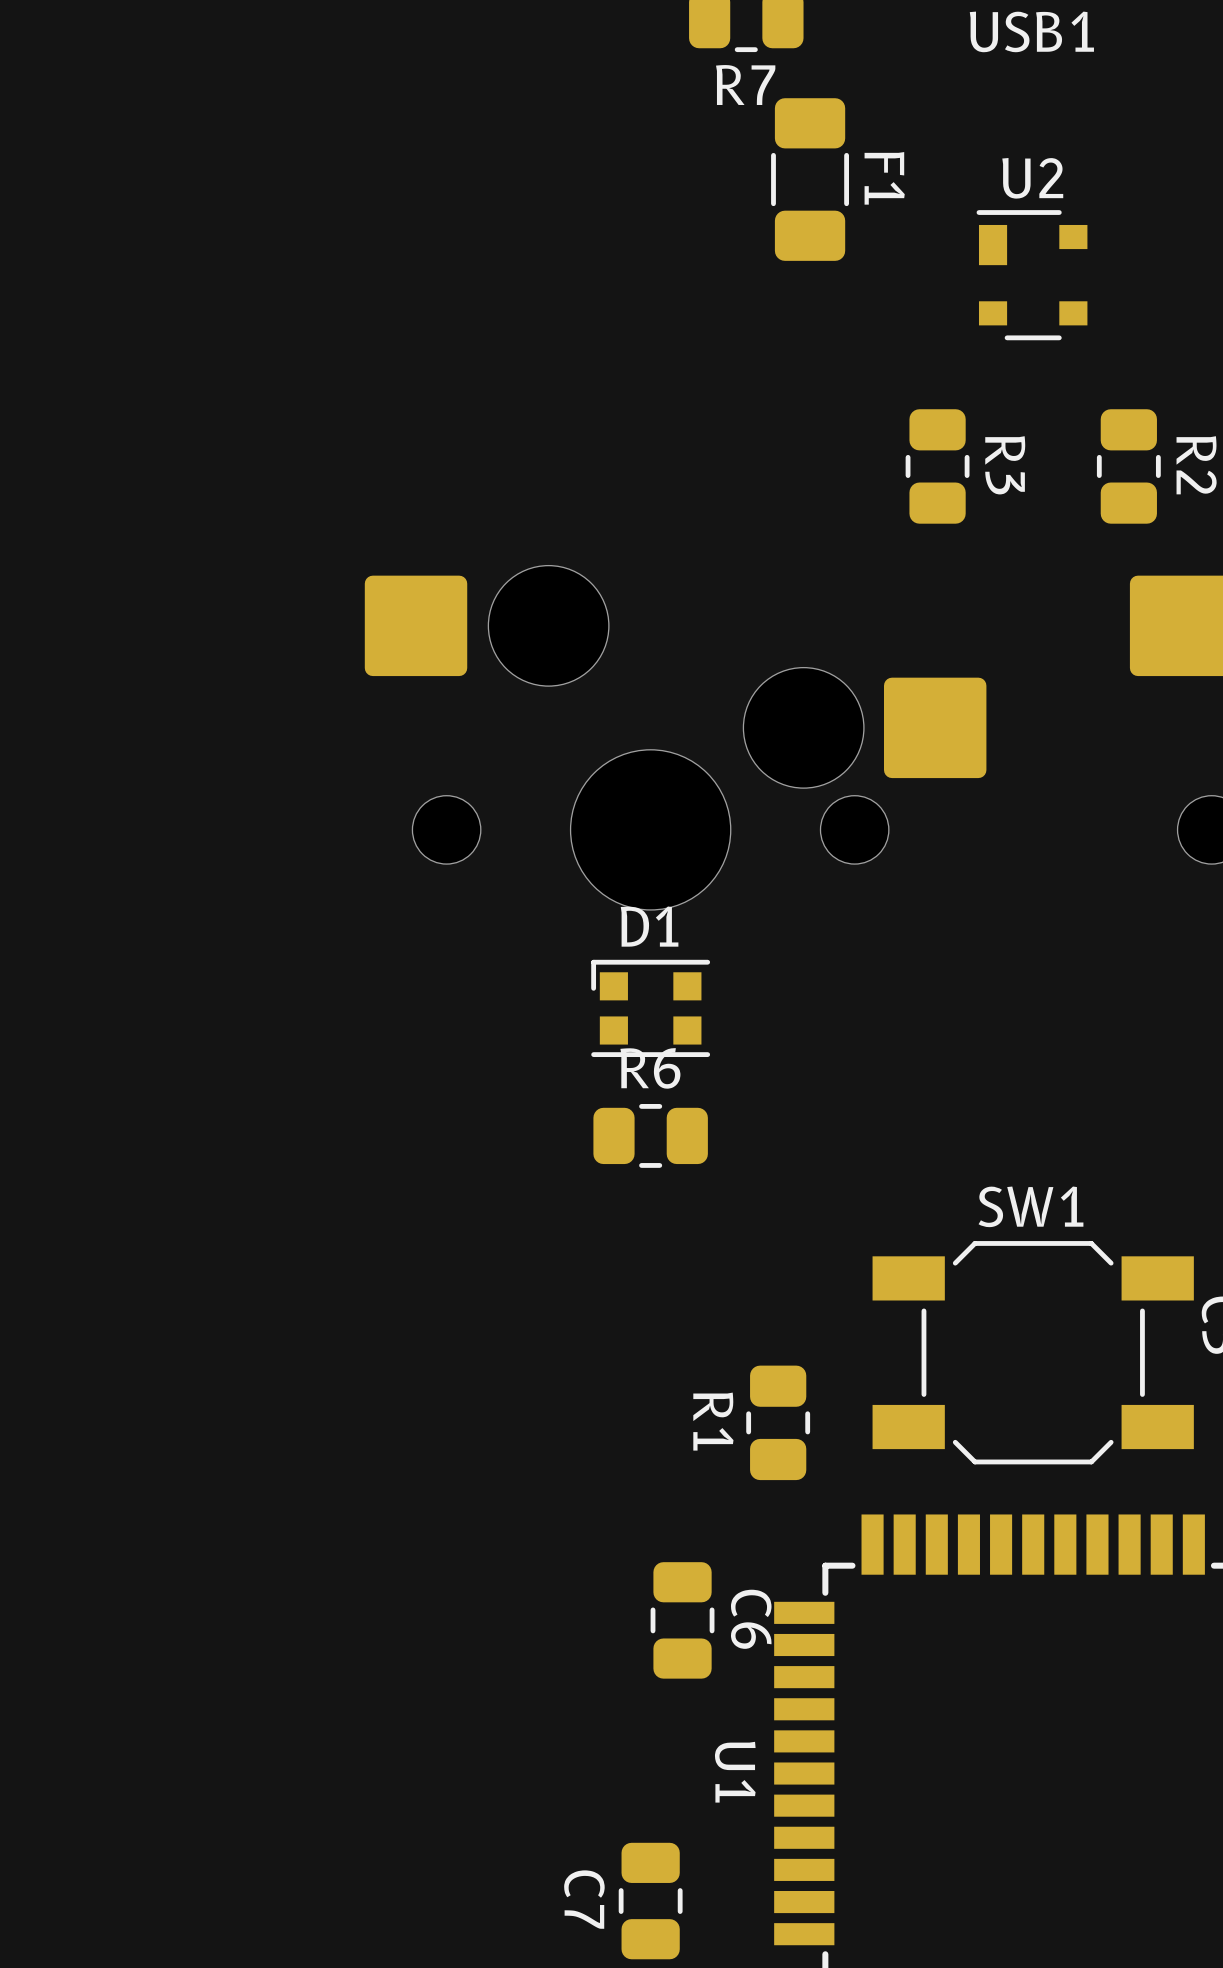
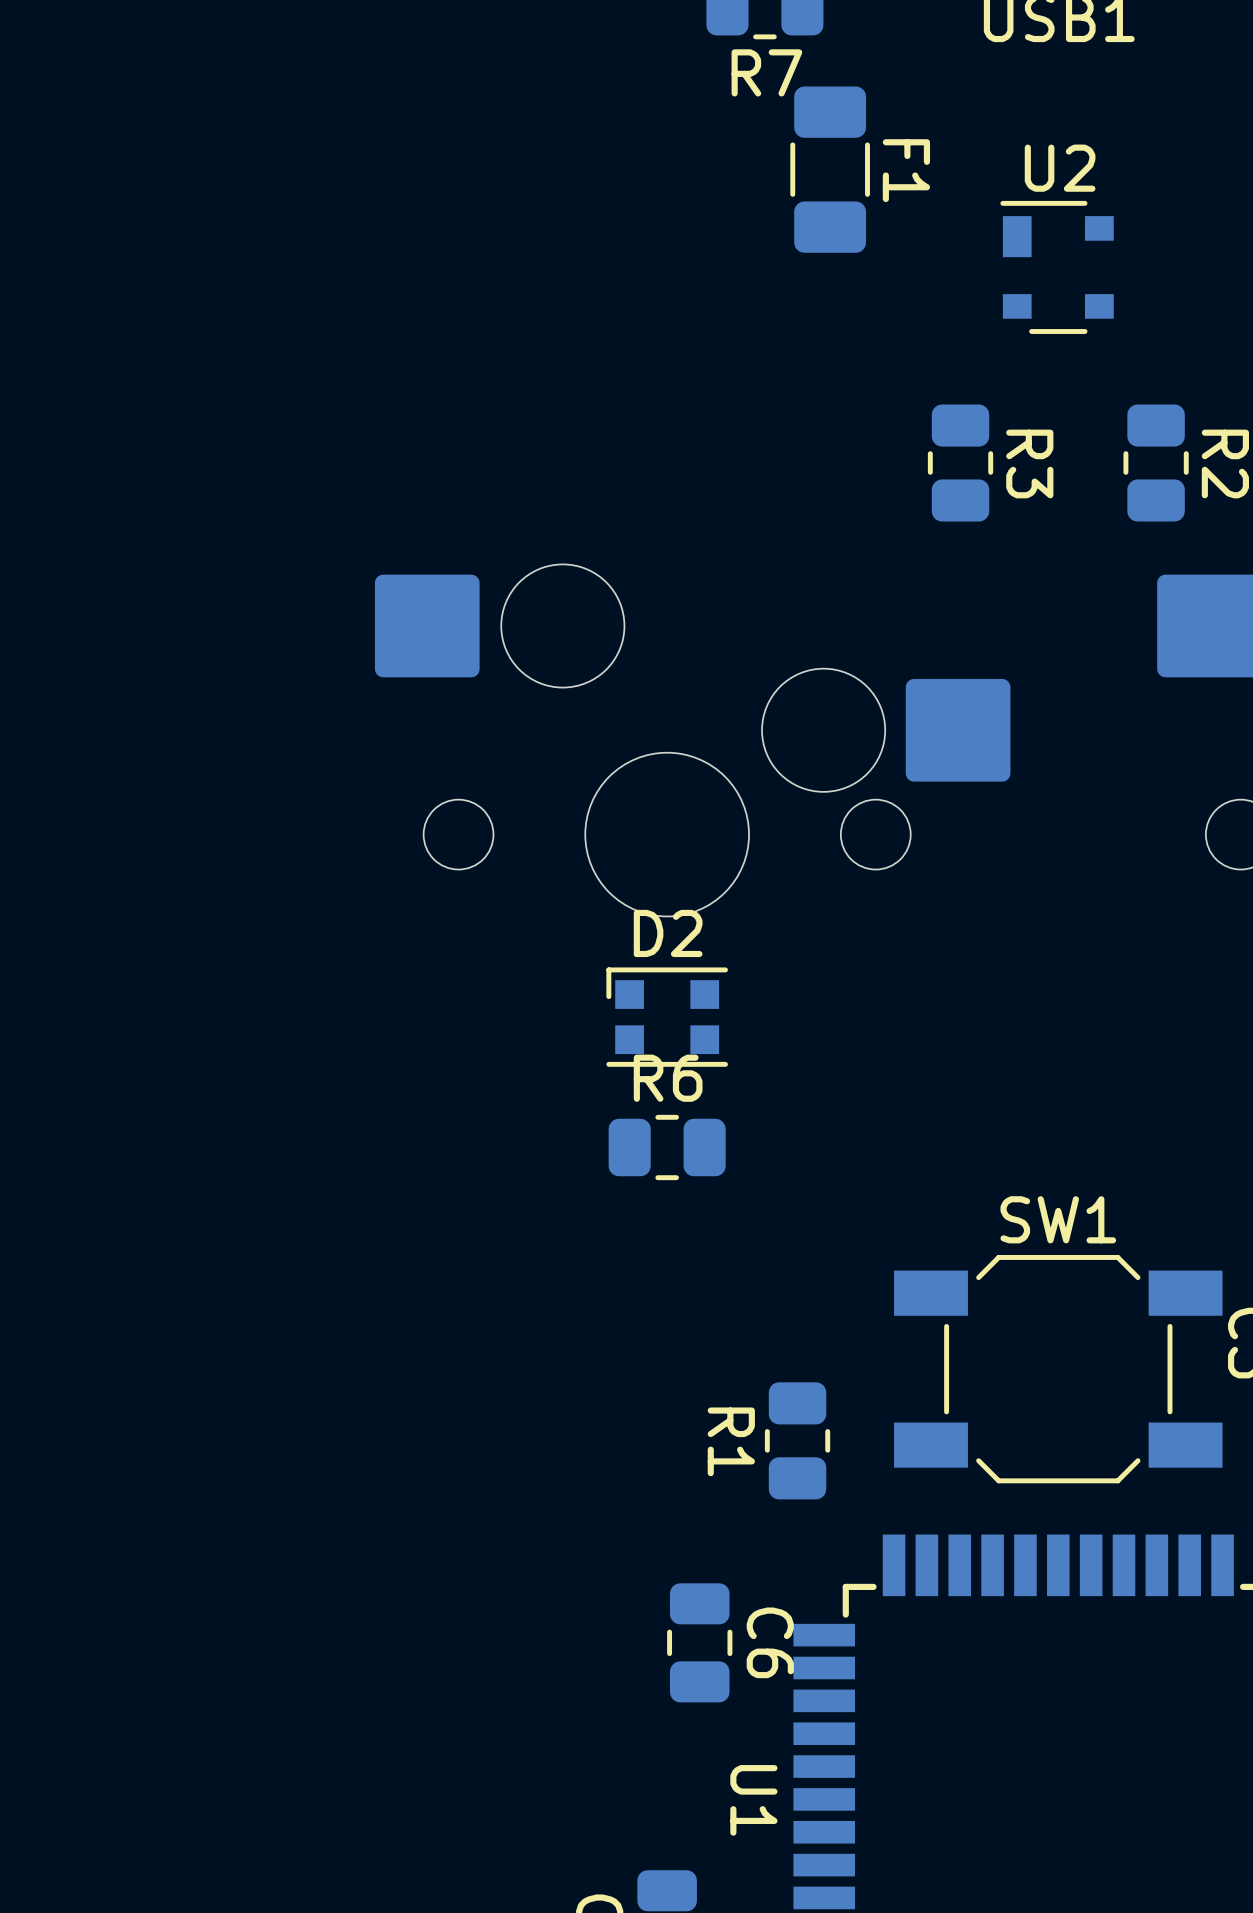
D1 name: D1 (649, 926) -> D2 (668, 933)

